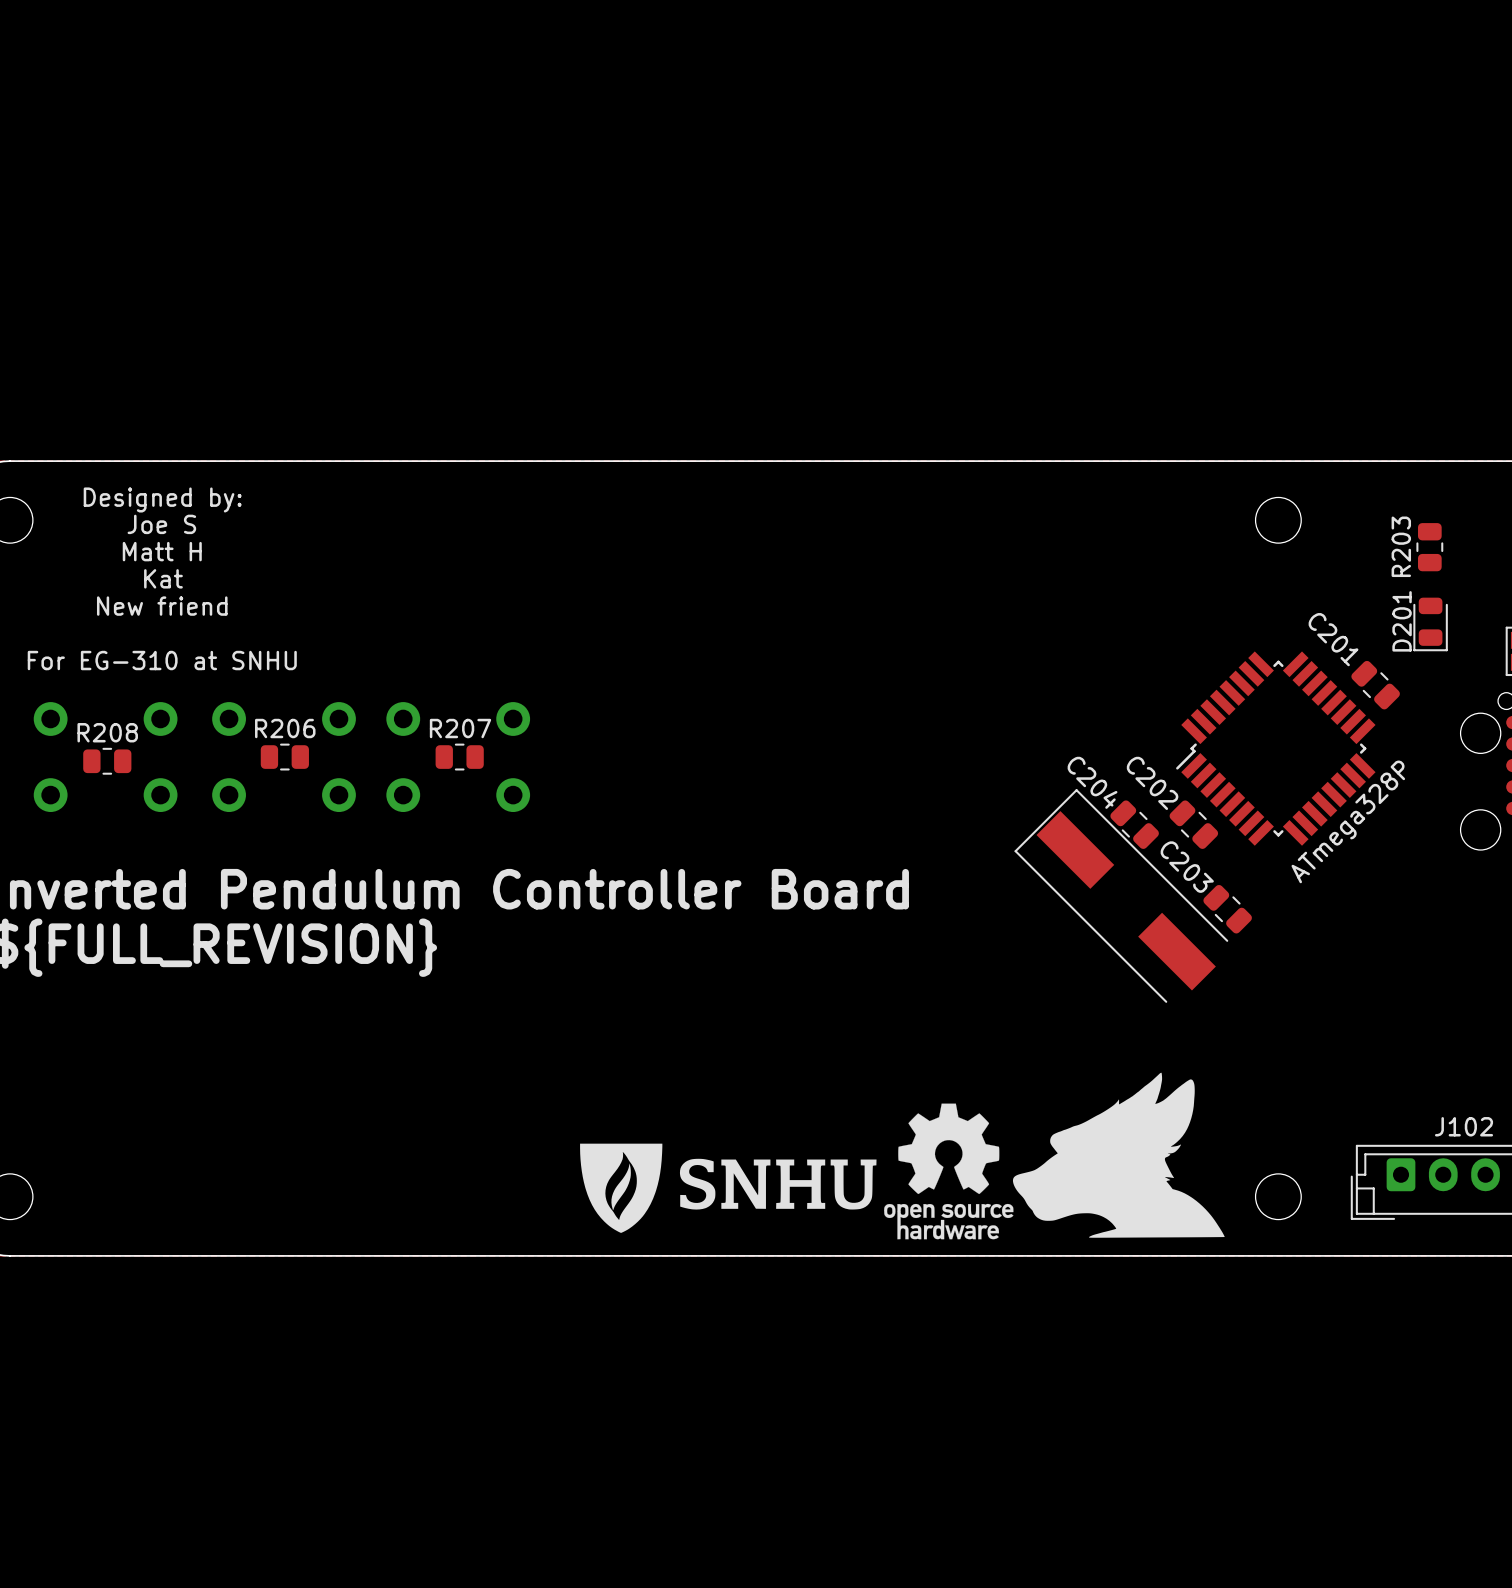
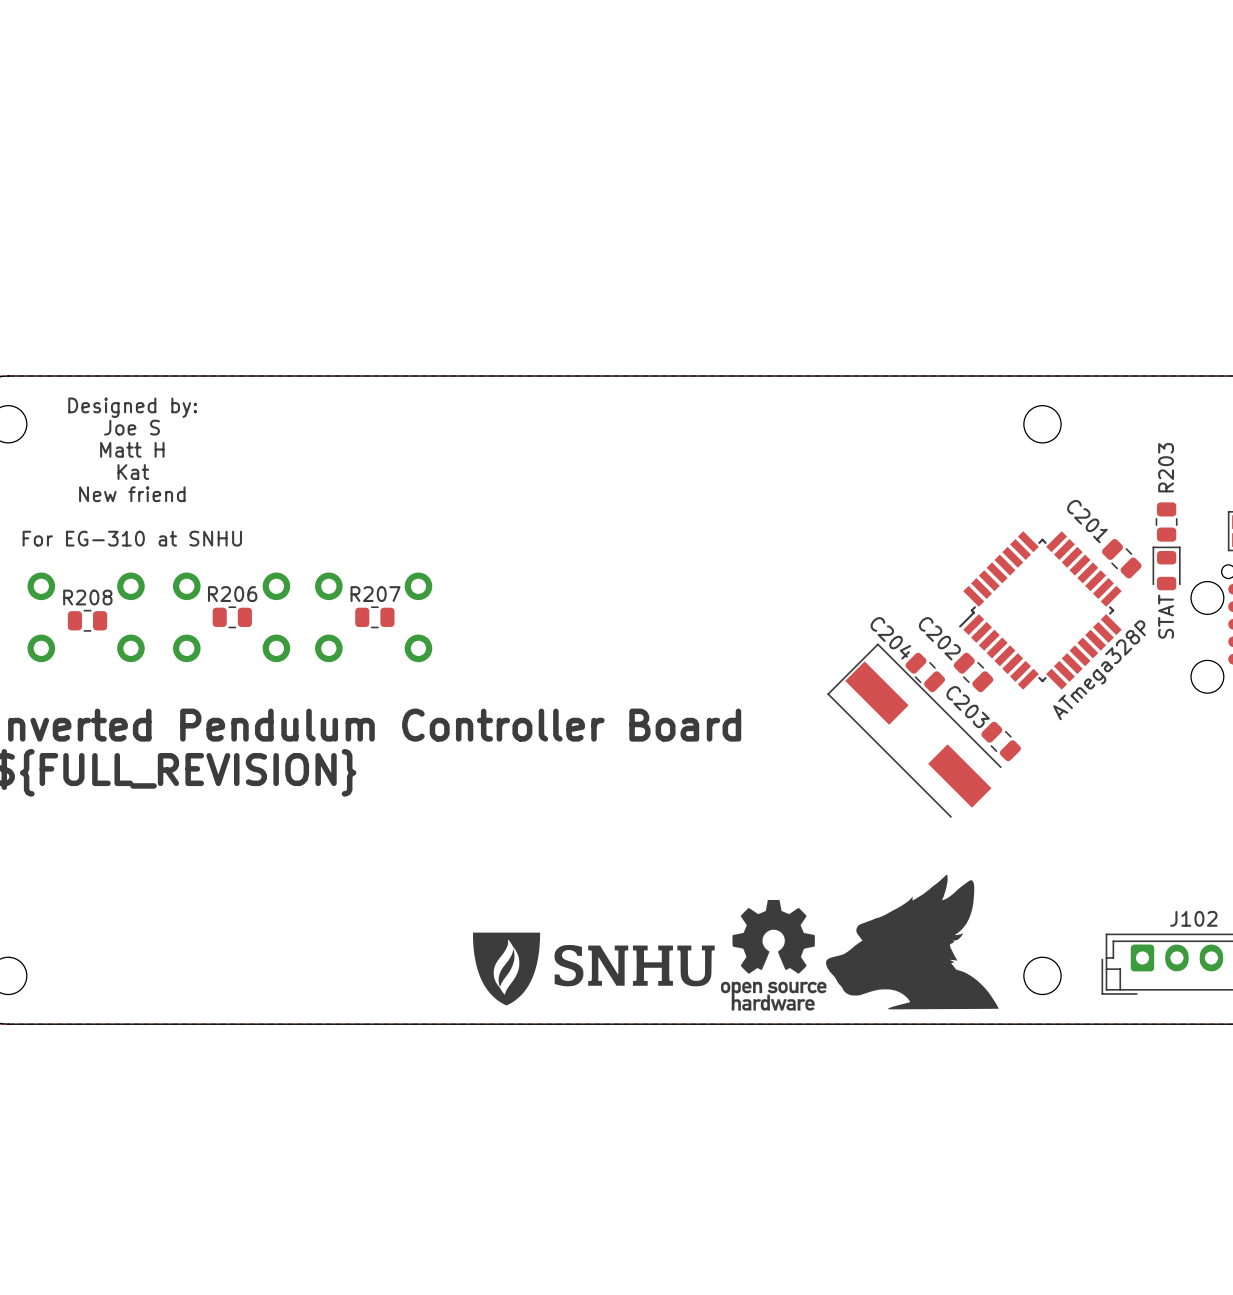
R203 name position: R203 (1401, 546) -> R203 (1166, 467)
R203 position: (1429, 547) -> (1166, 522)
D201: (1430, 624) -> none
part: none -> STAT (1166, 568)

